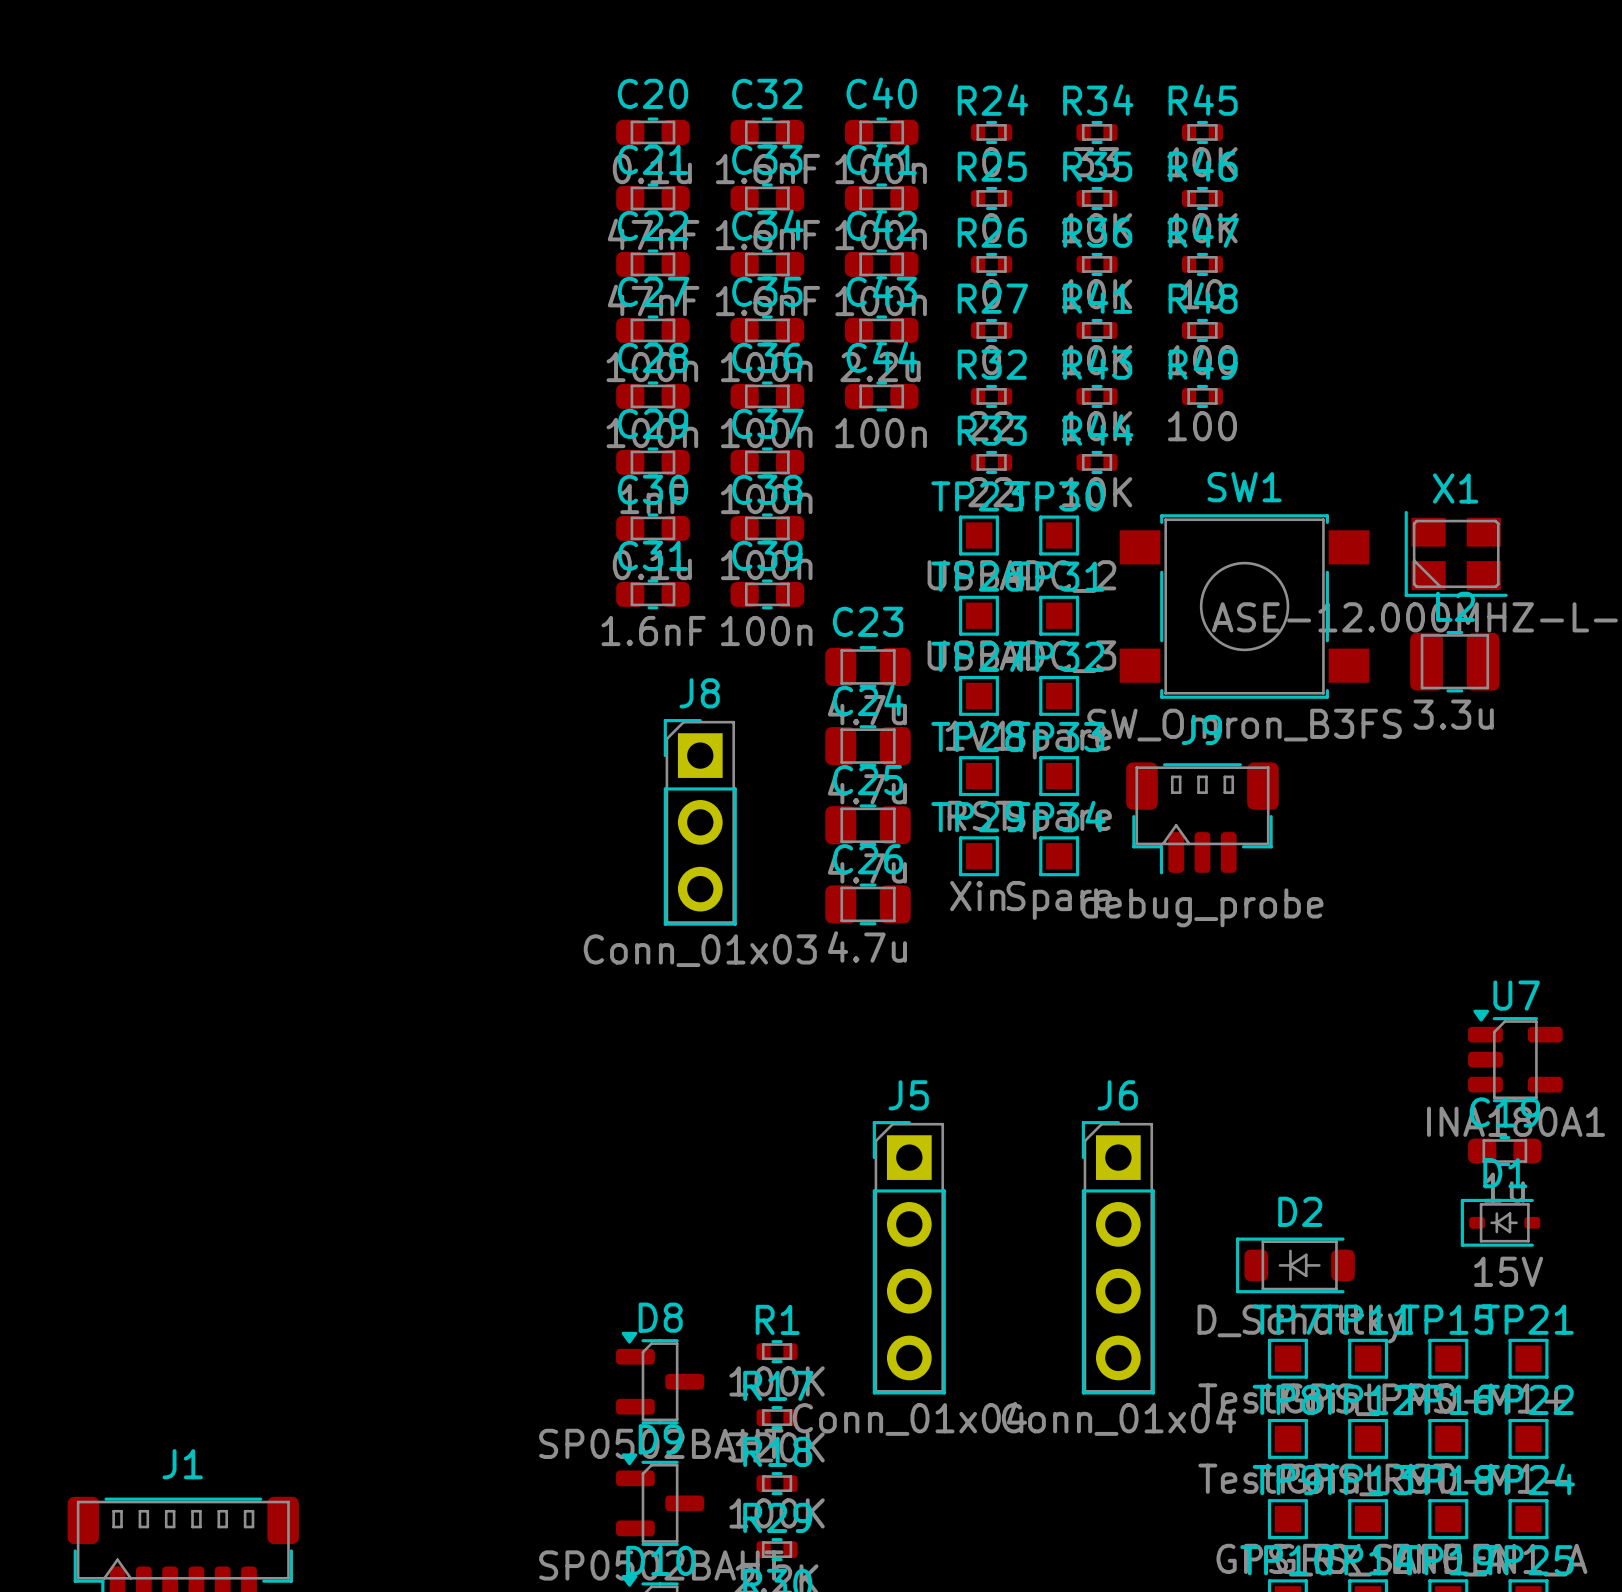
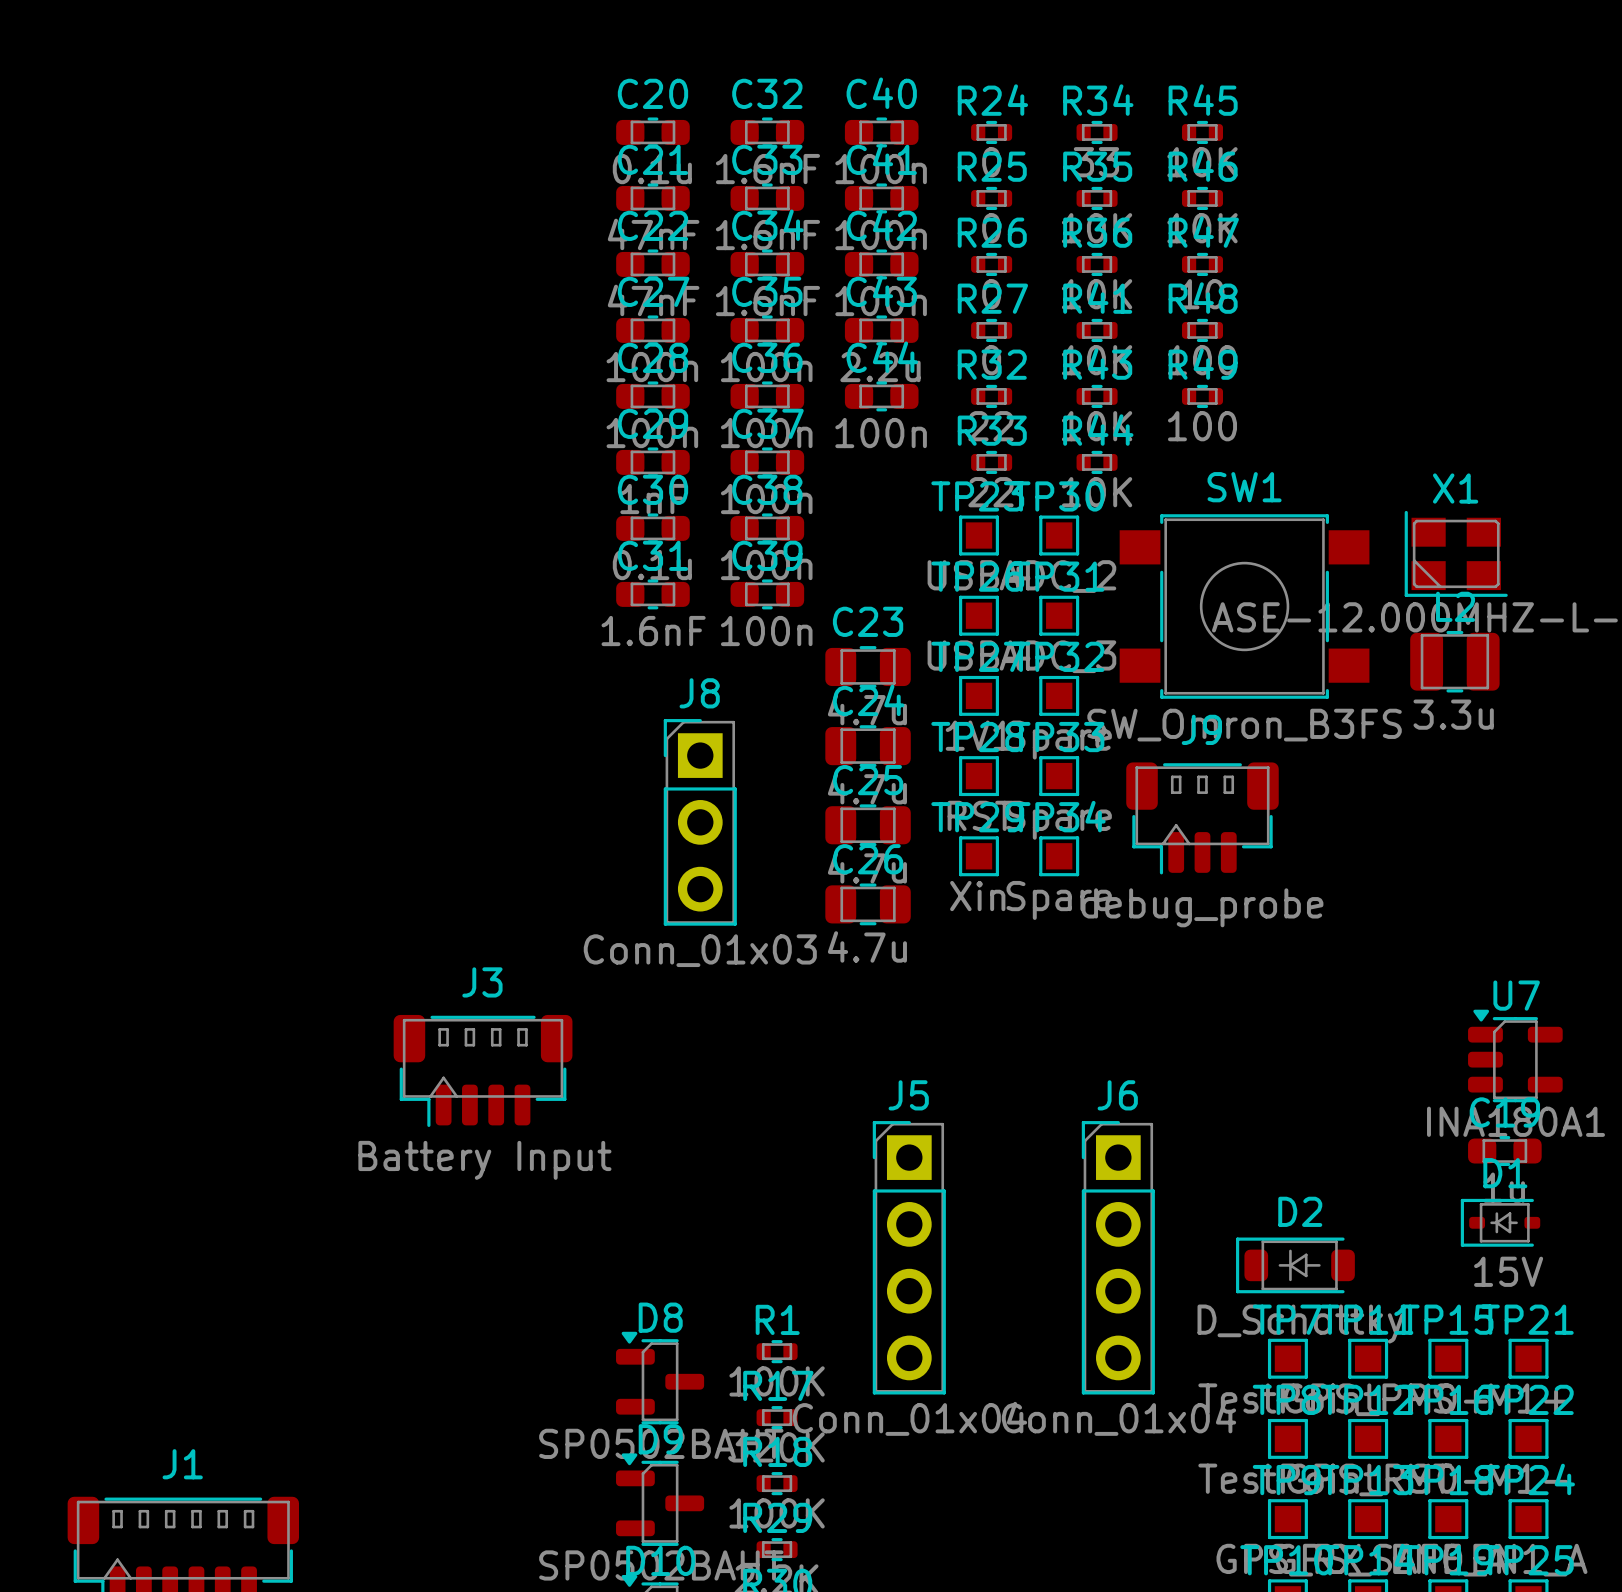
J3: none -> Battery Input (483, 1070)

